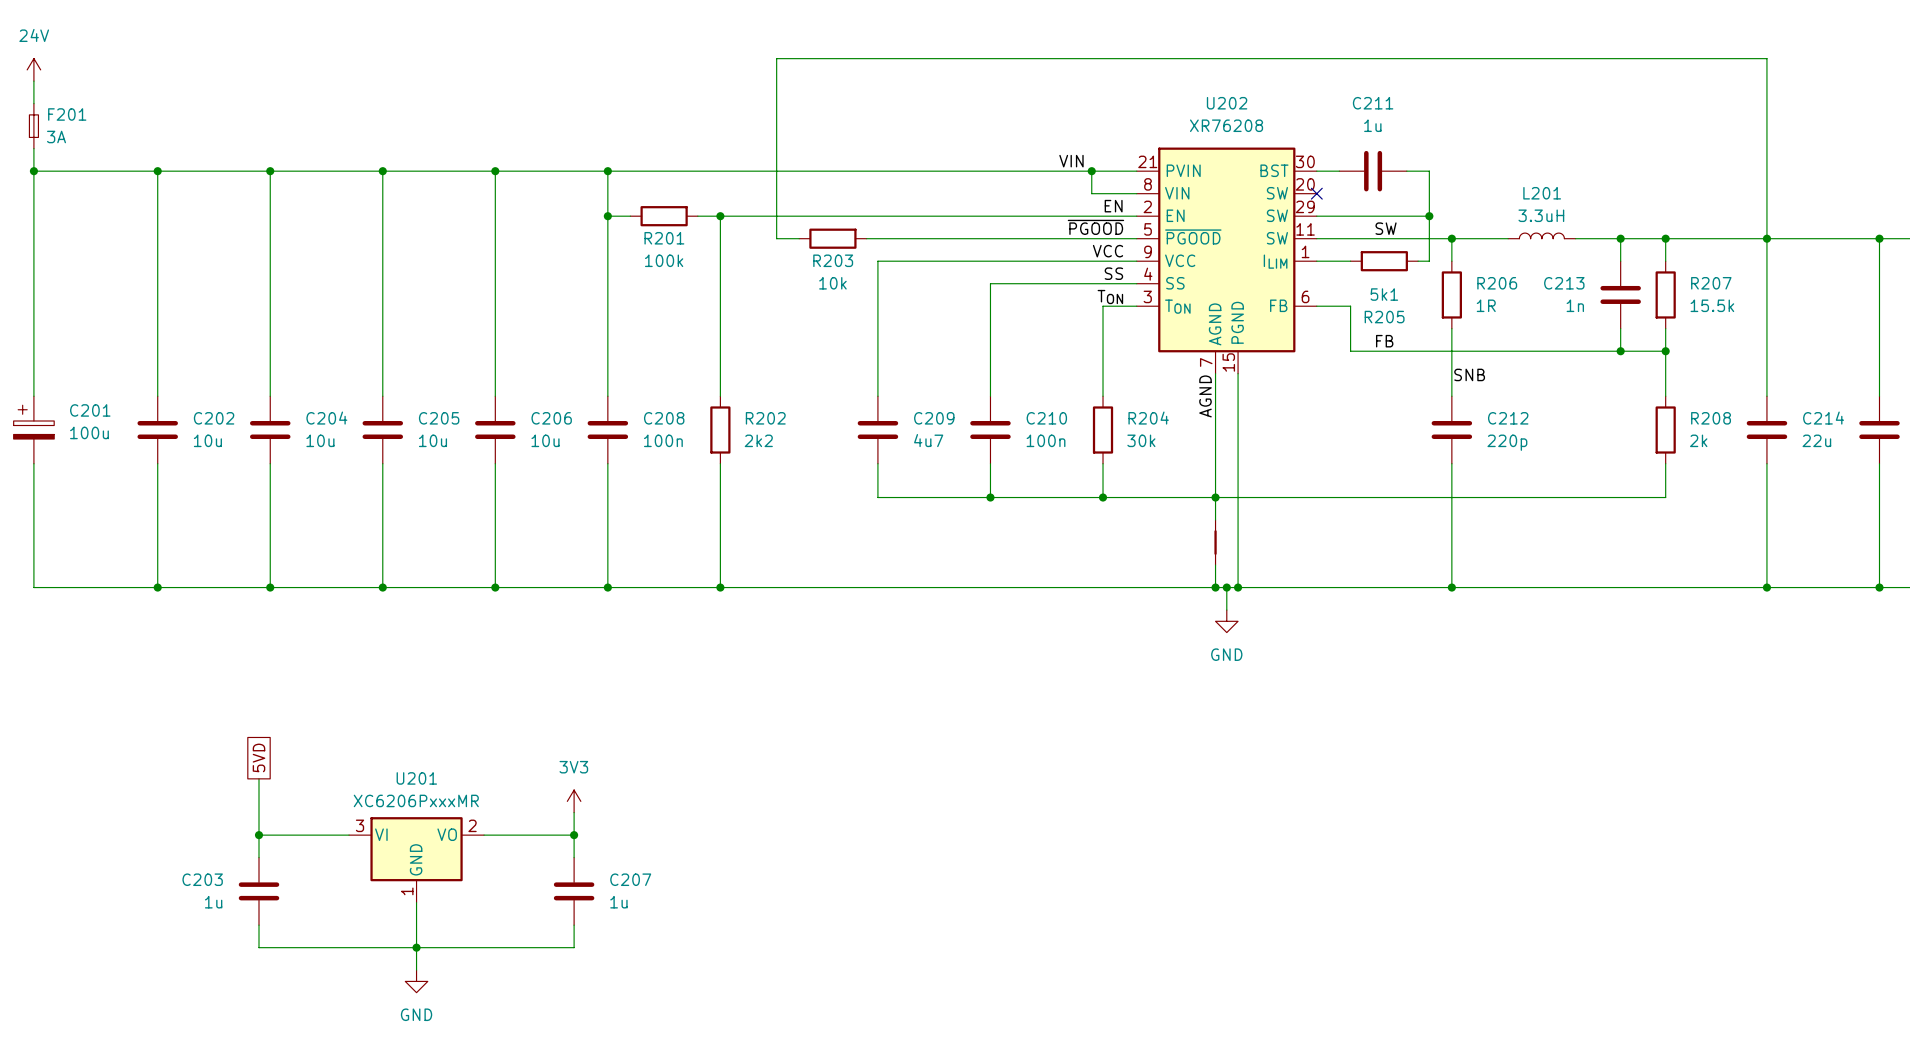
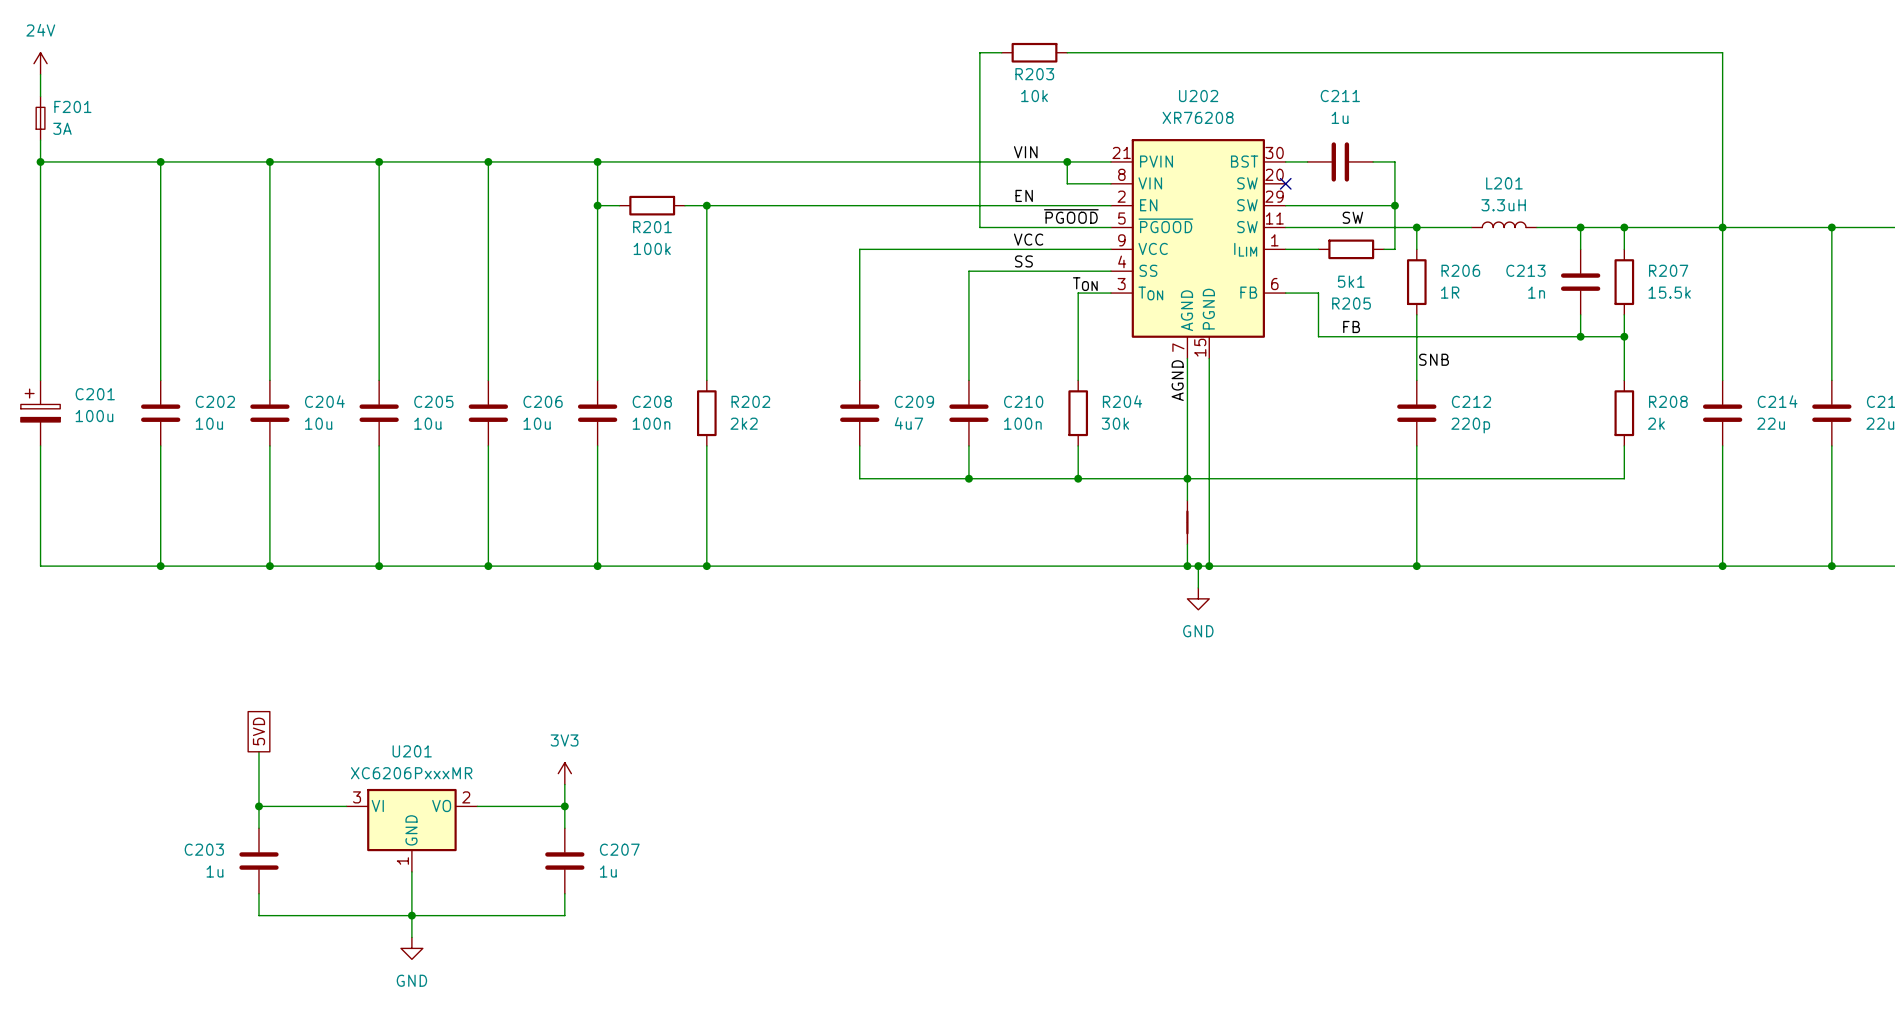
wire: (1001, 58) (776, 58) (776, 238) (799, 238) -> (979, 52) (979, 227)
wire: (1024, 58) (1091, 58) -> none
label position: VIN (1071, 161) -> VIN (1025, 152)
label position: EN (1113, 206) -> EN (1024, 195)
R203 position: (832, 238) -> (1034, 52)
wire: (866, 238) (1001, 238) -> none
label position: VCC (1108, 251) -> VCC (1028, 239)
label position: SS (1113, 273) -> SS (1023, 261)

